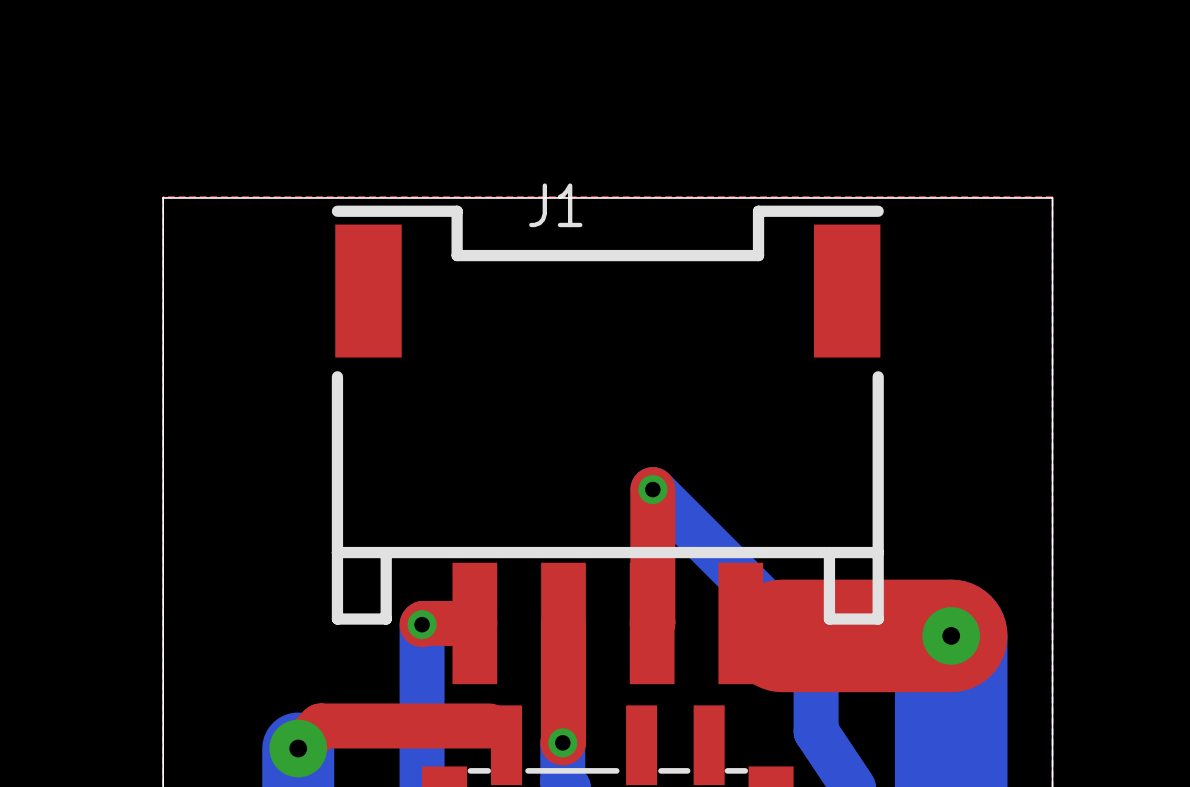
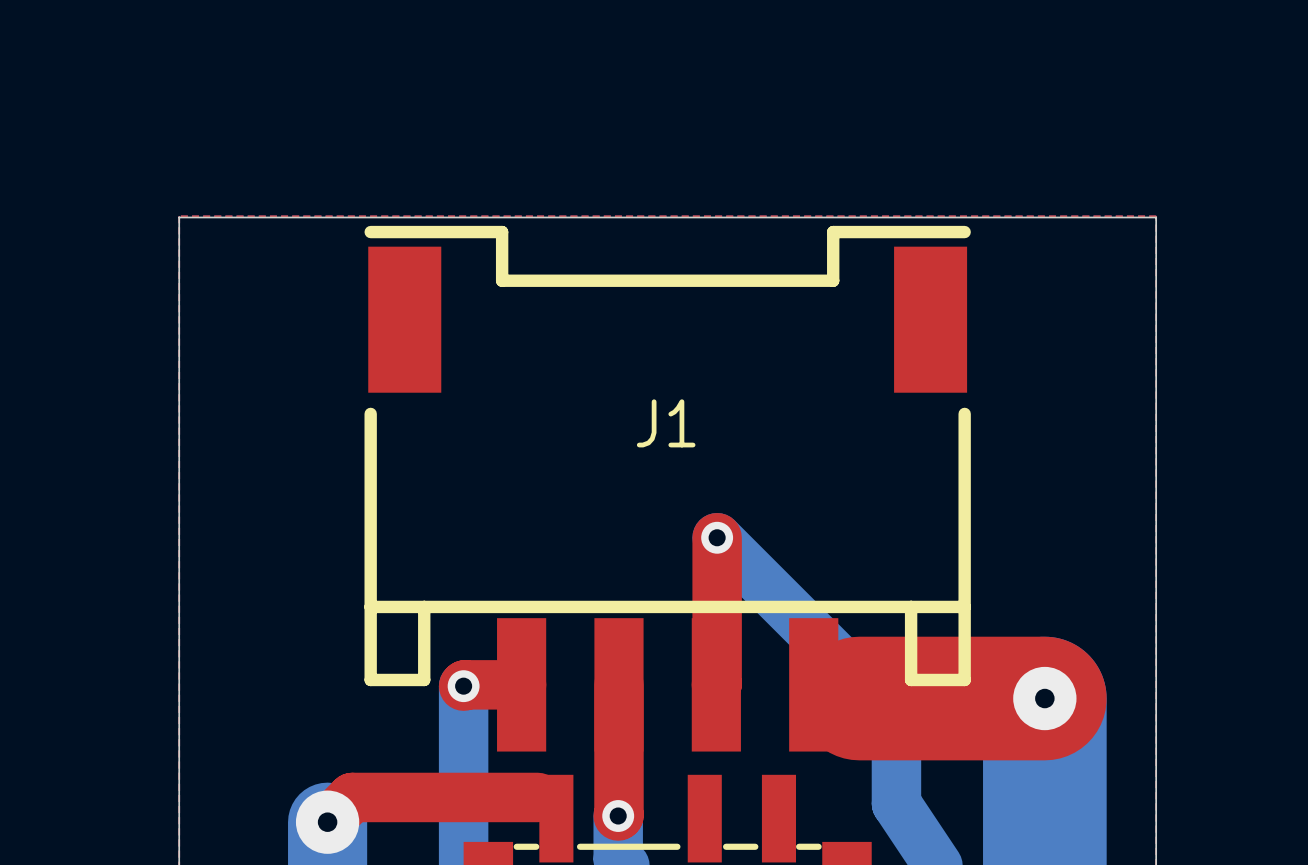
J1 name position: J1 (555, 205) -> J1 (666, 423)

